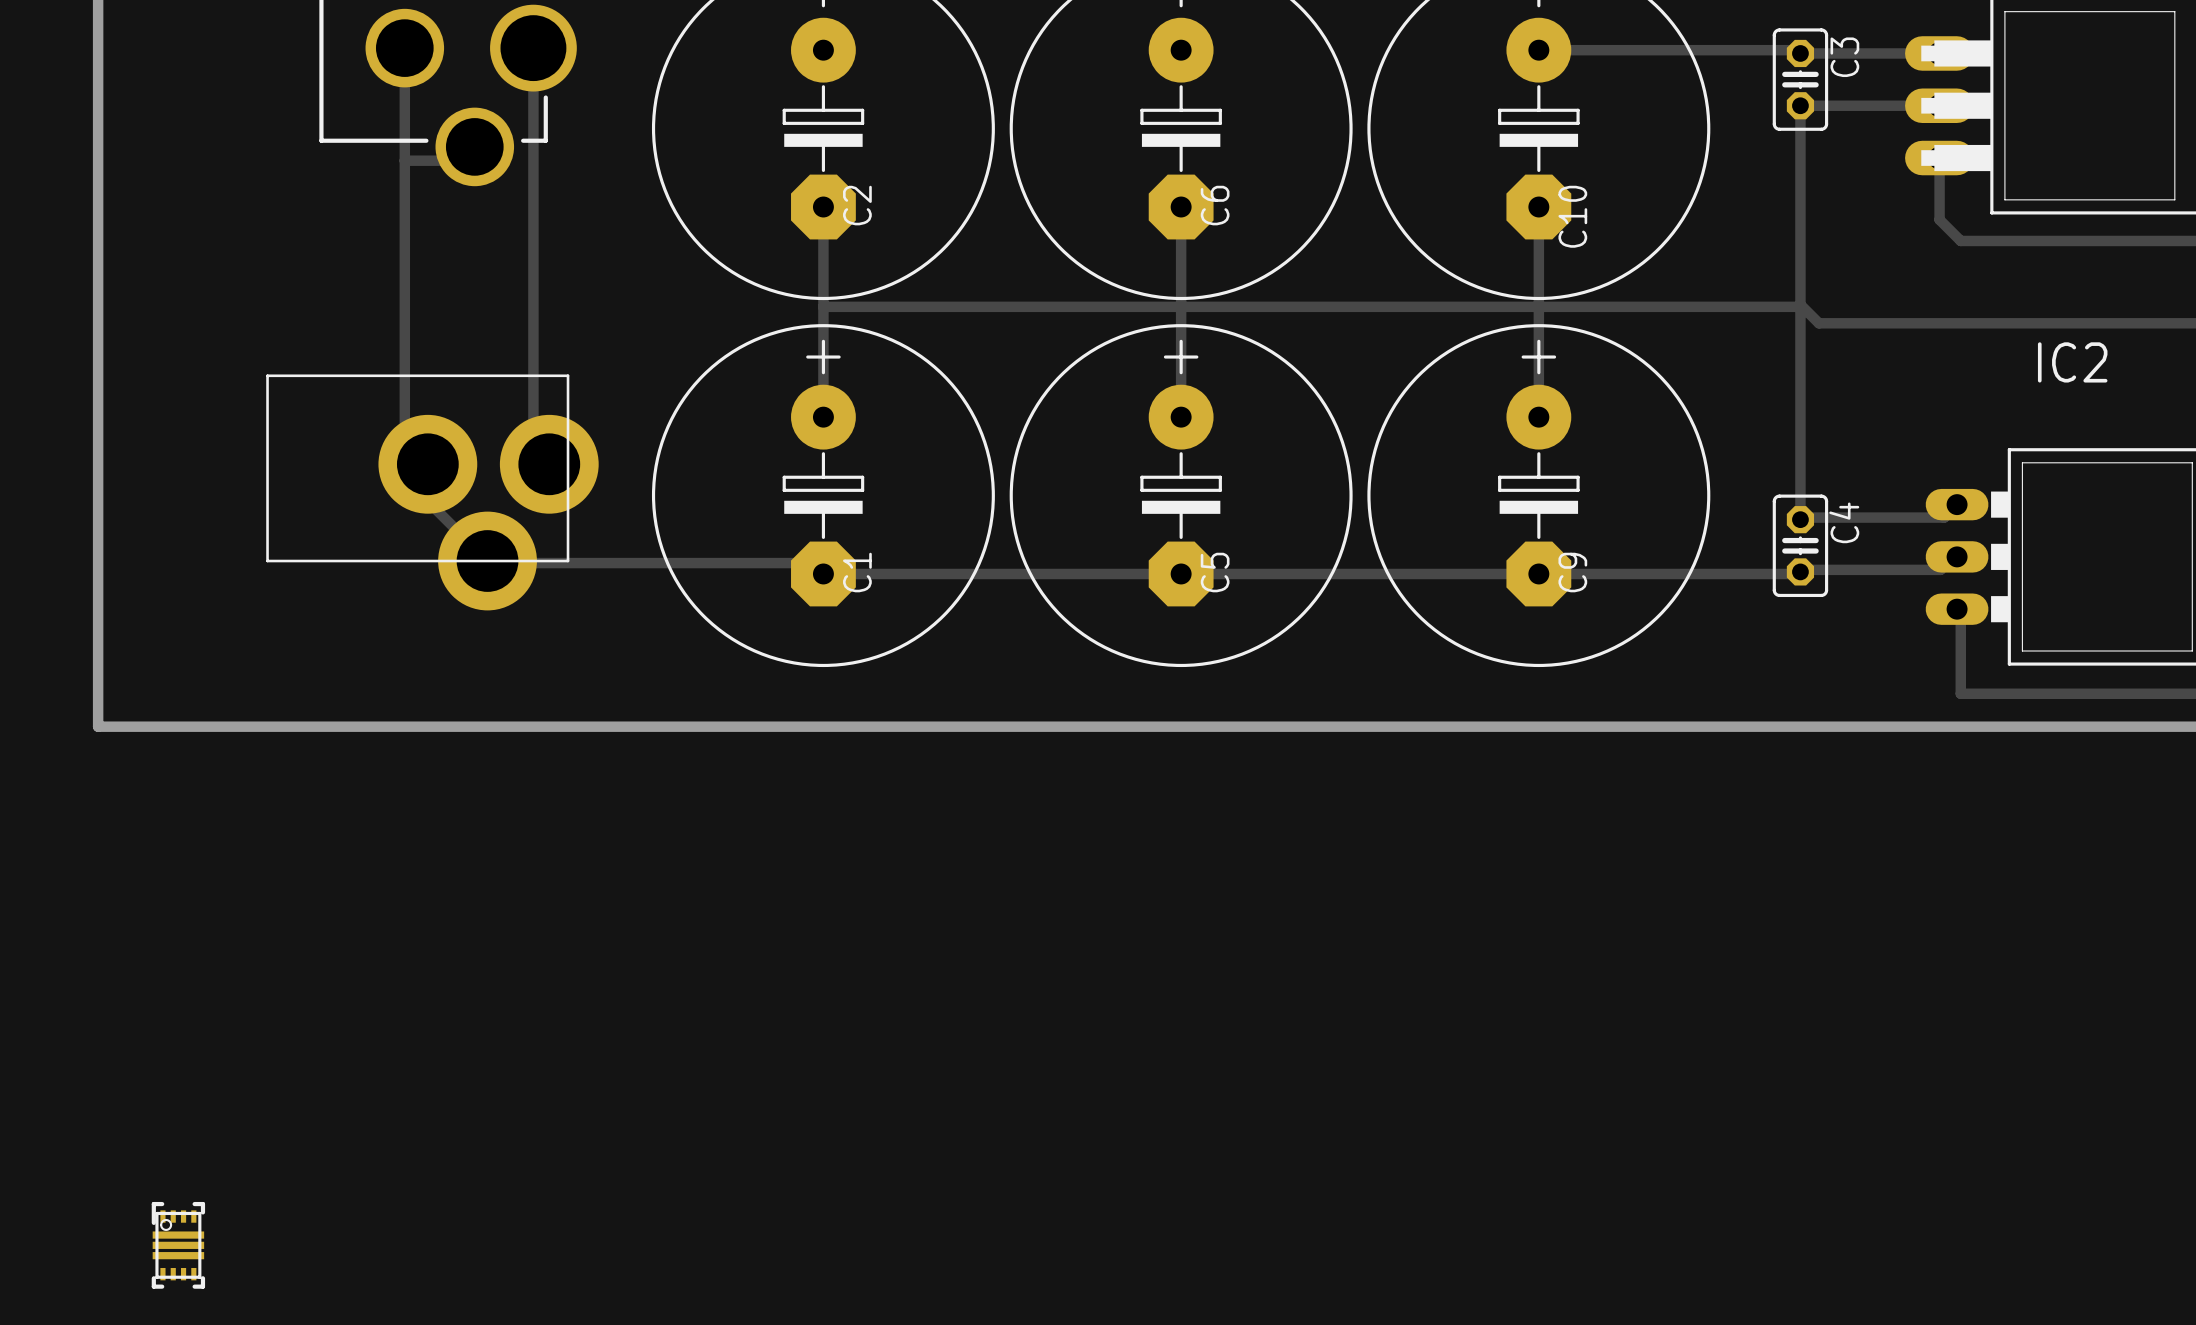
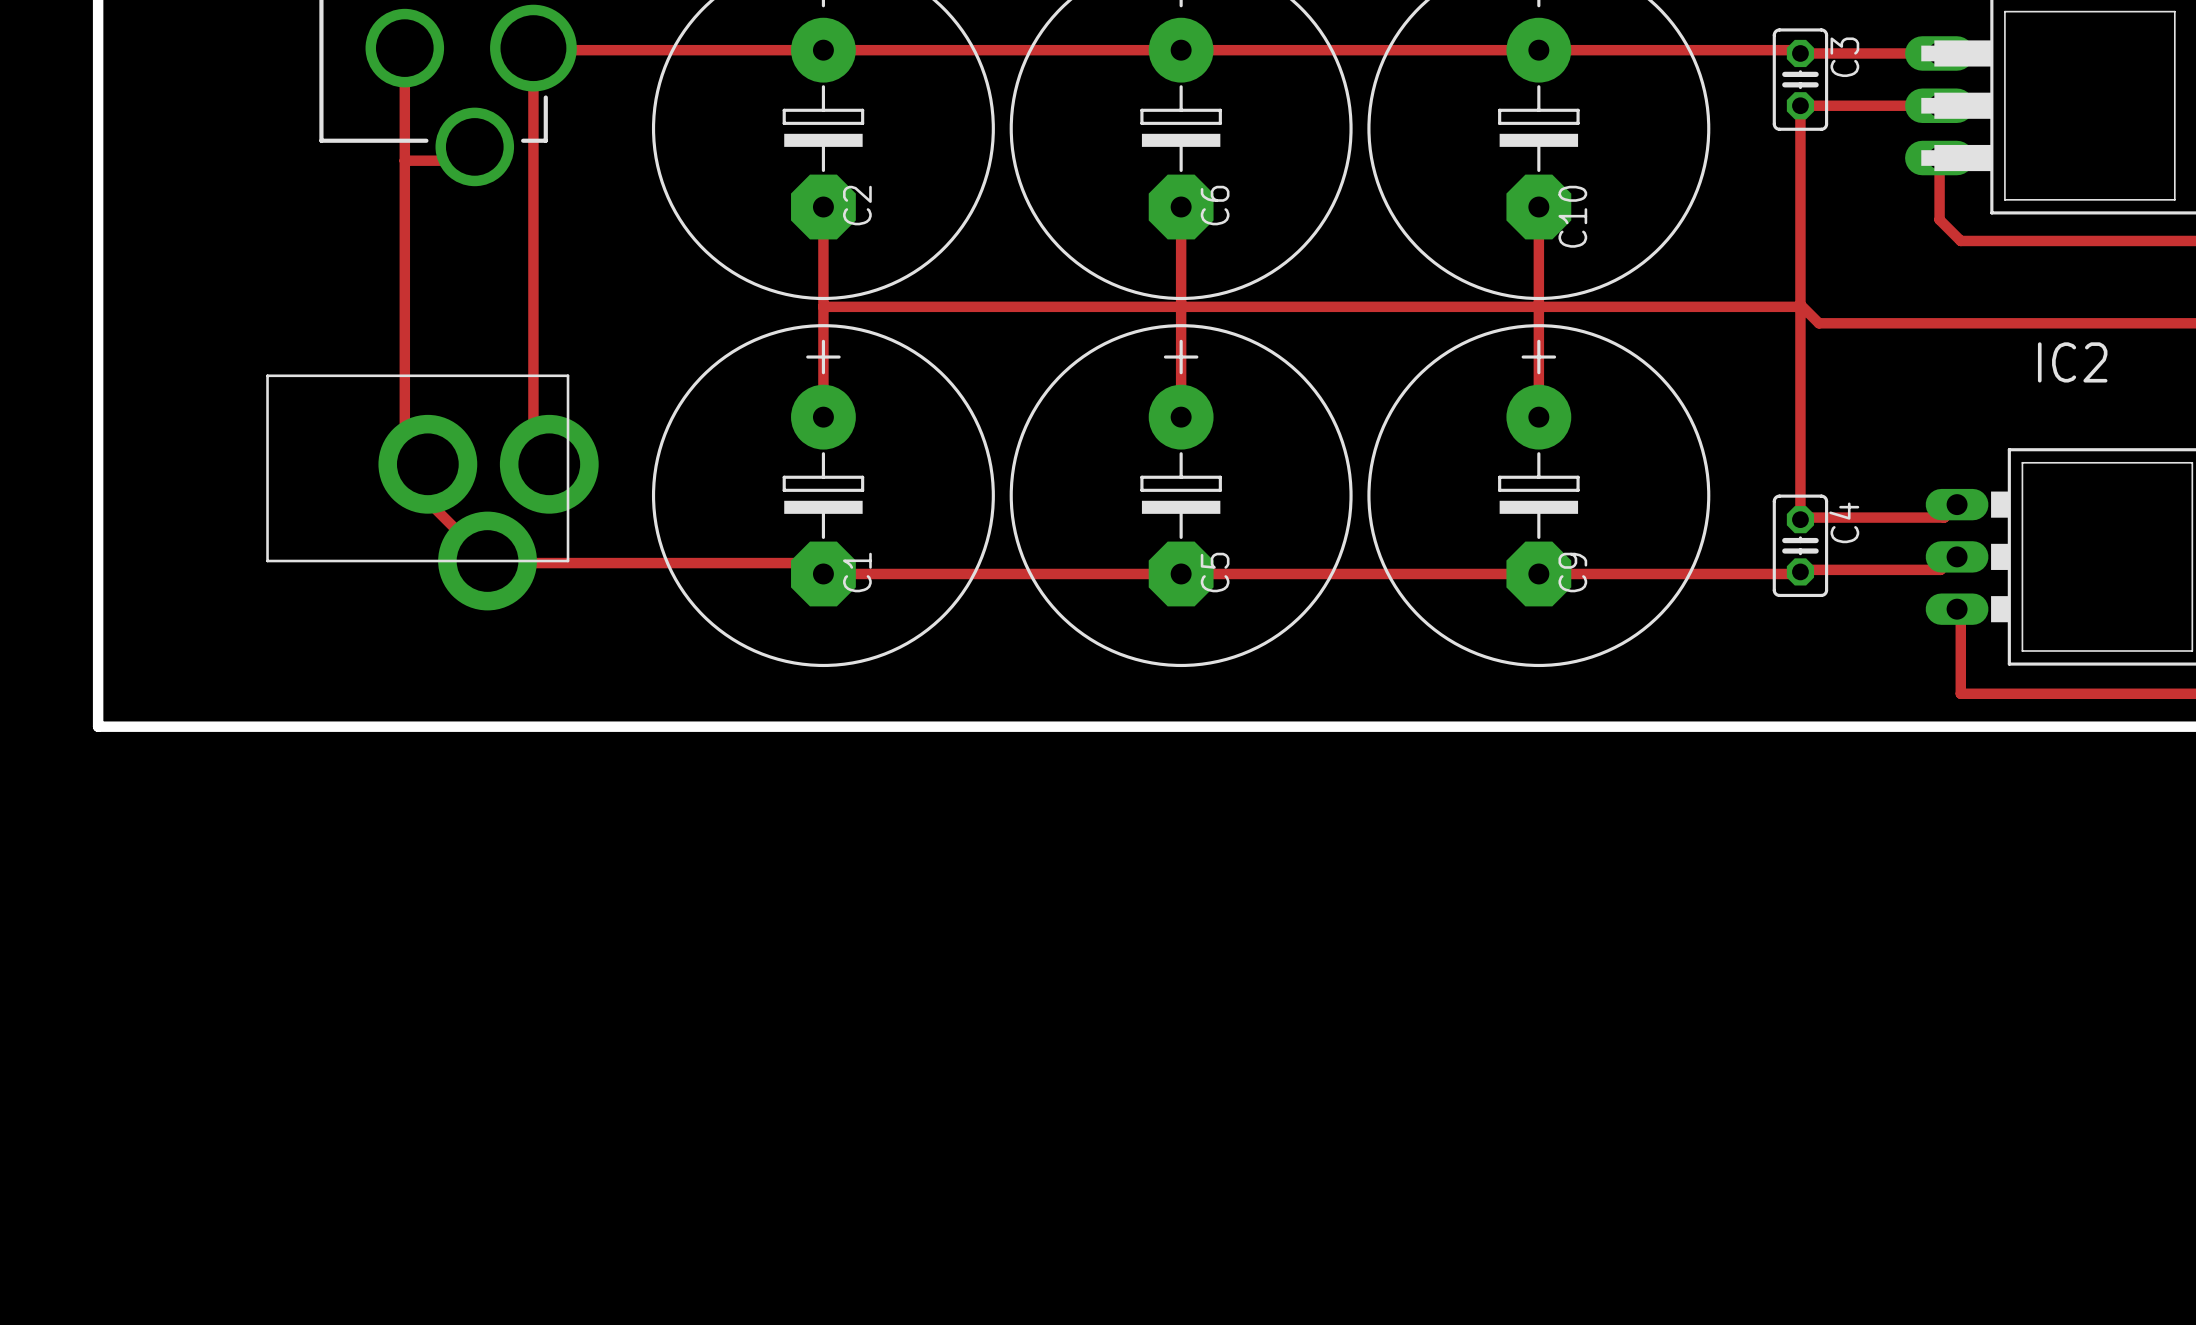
track: none -> (535, 50) (1538, 50)
part: (178, 1245) -> none

